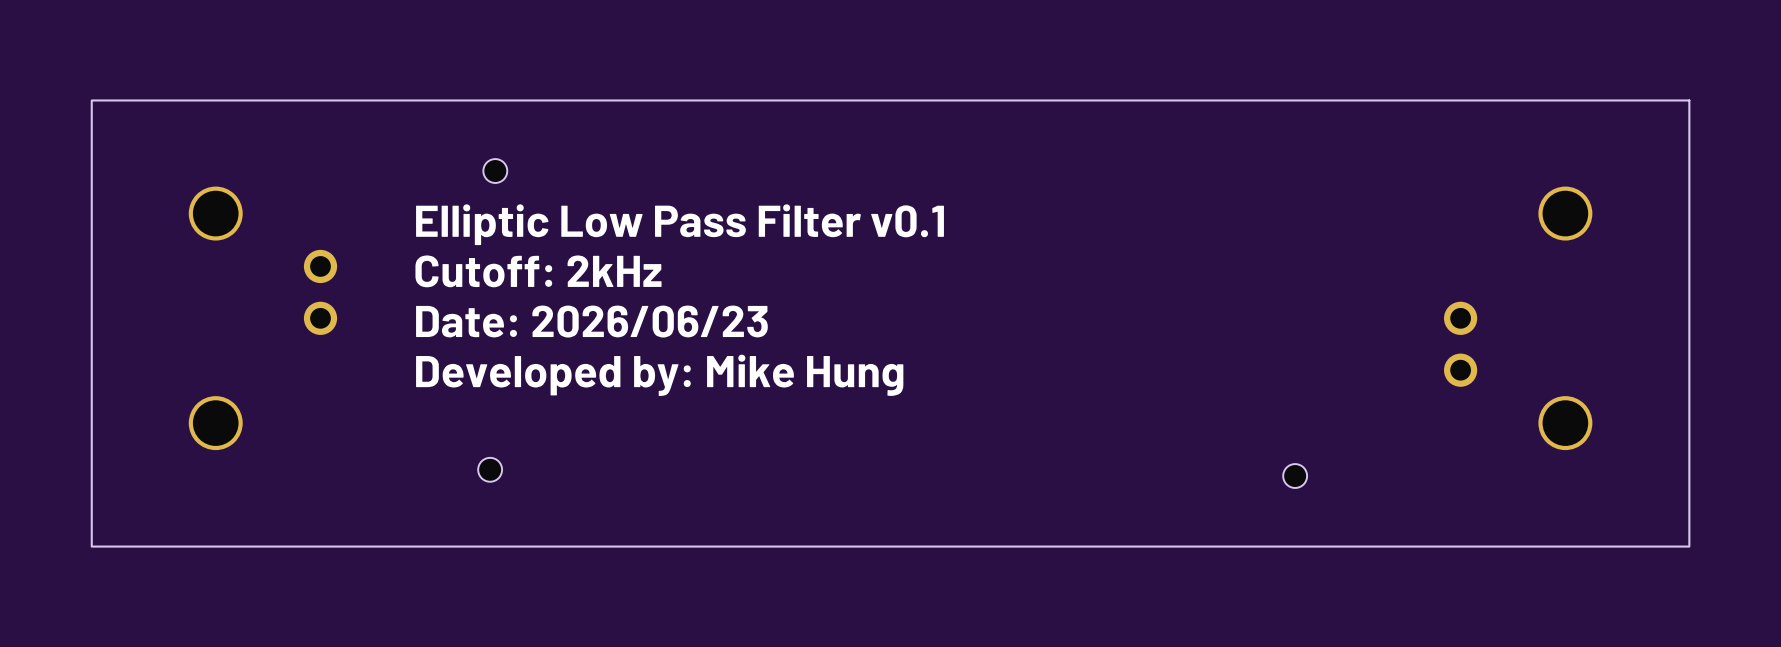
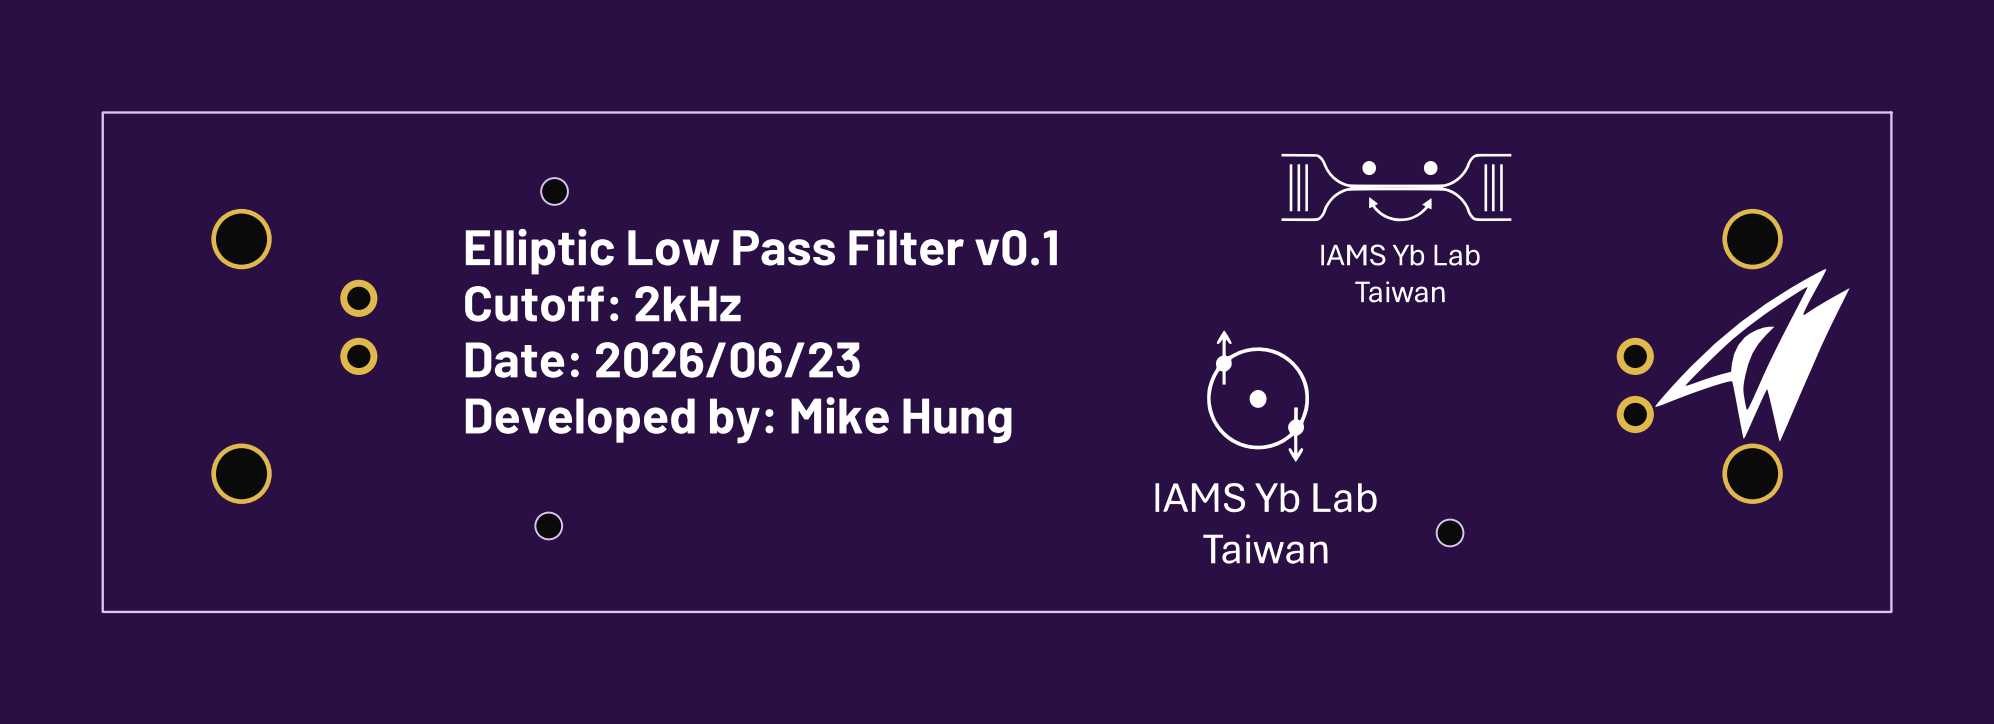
drawing: none -> [1281, 153, 1512, 303]
drawing: none -> [1655, 268, 1850, 442]
drawing: none -> [1155, 330, 1377, 564]

